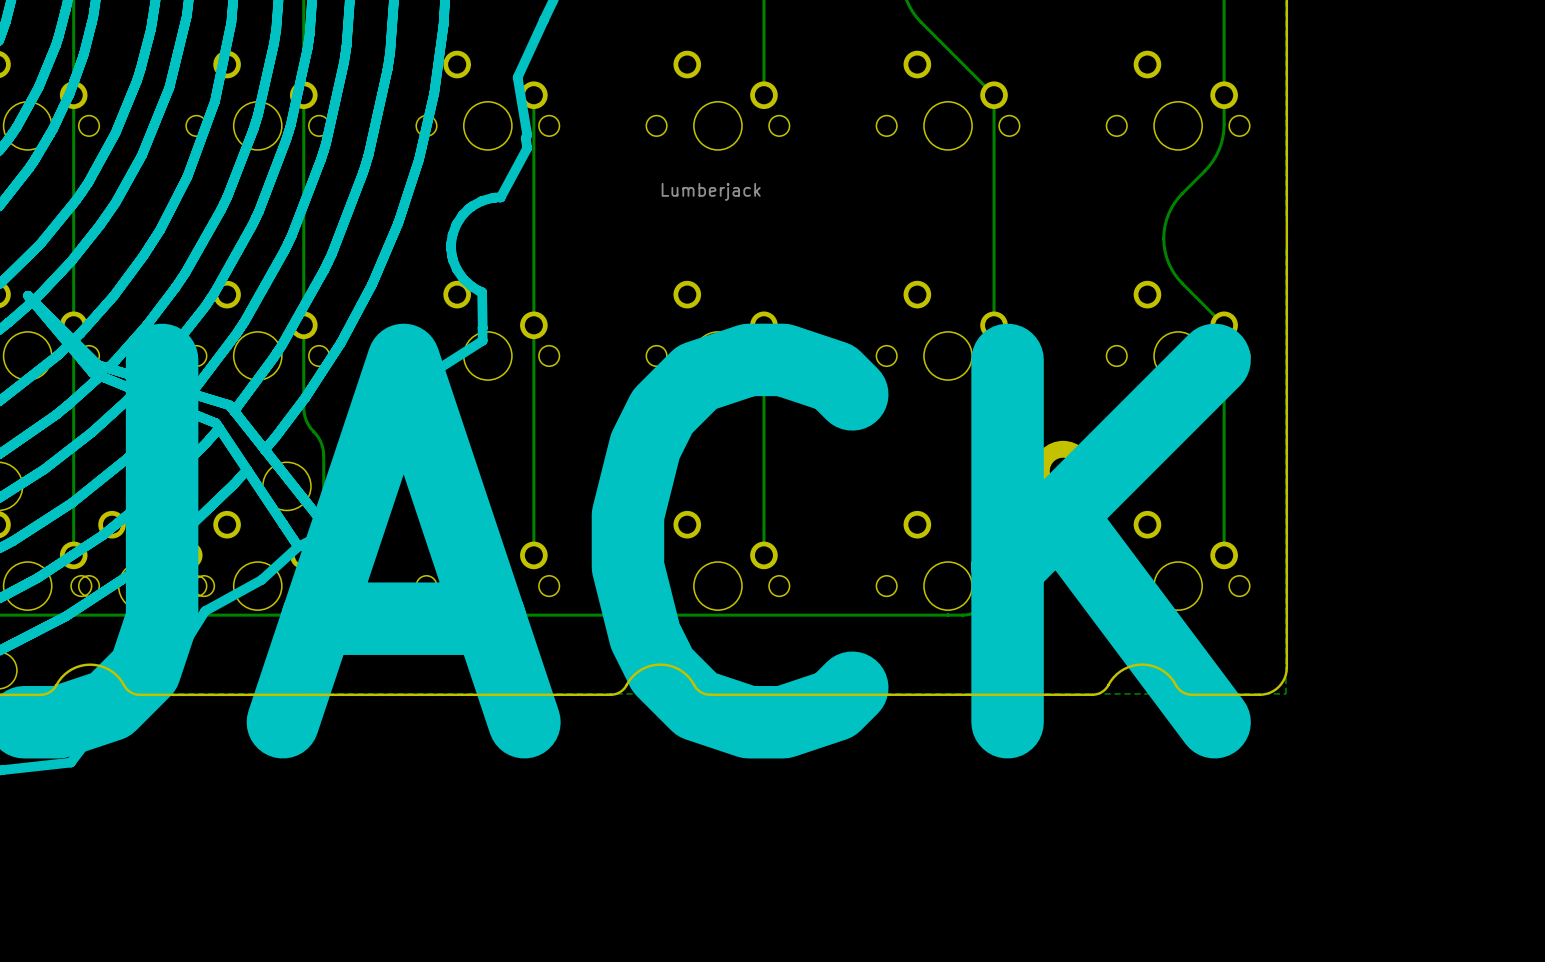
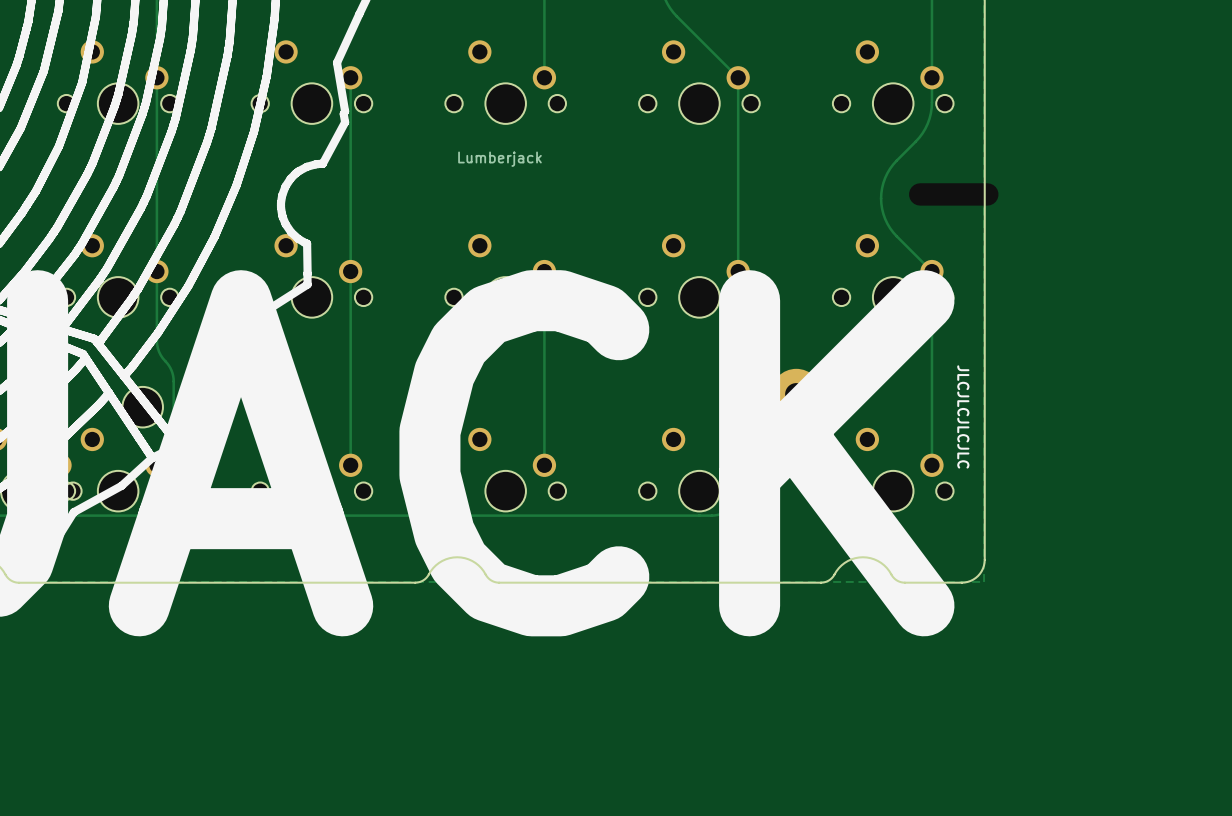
text: none -> JLCJLCJLCJLC (963, 416)

